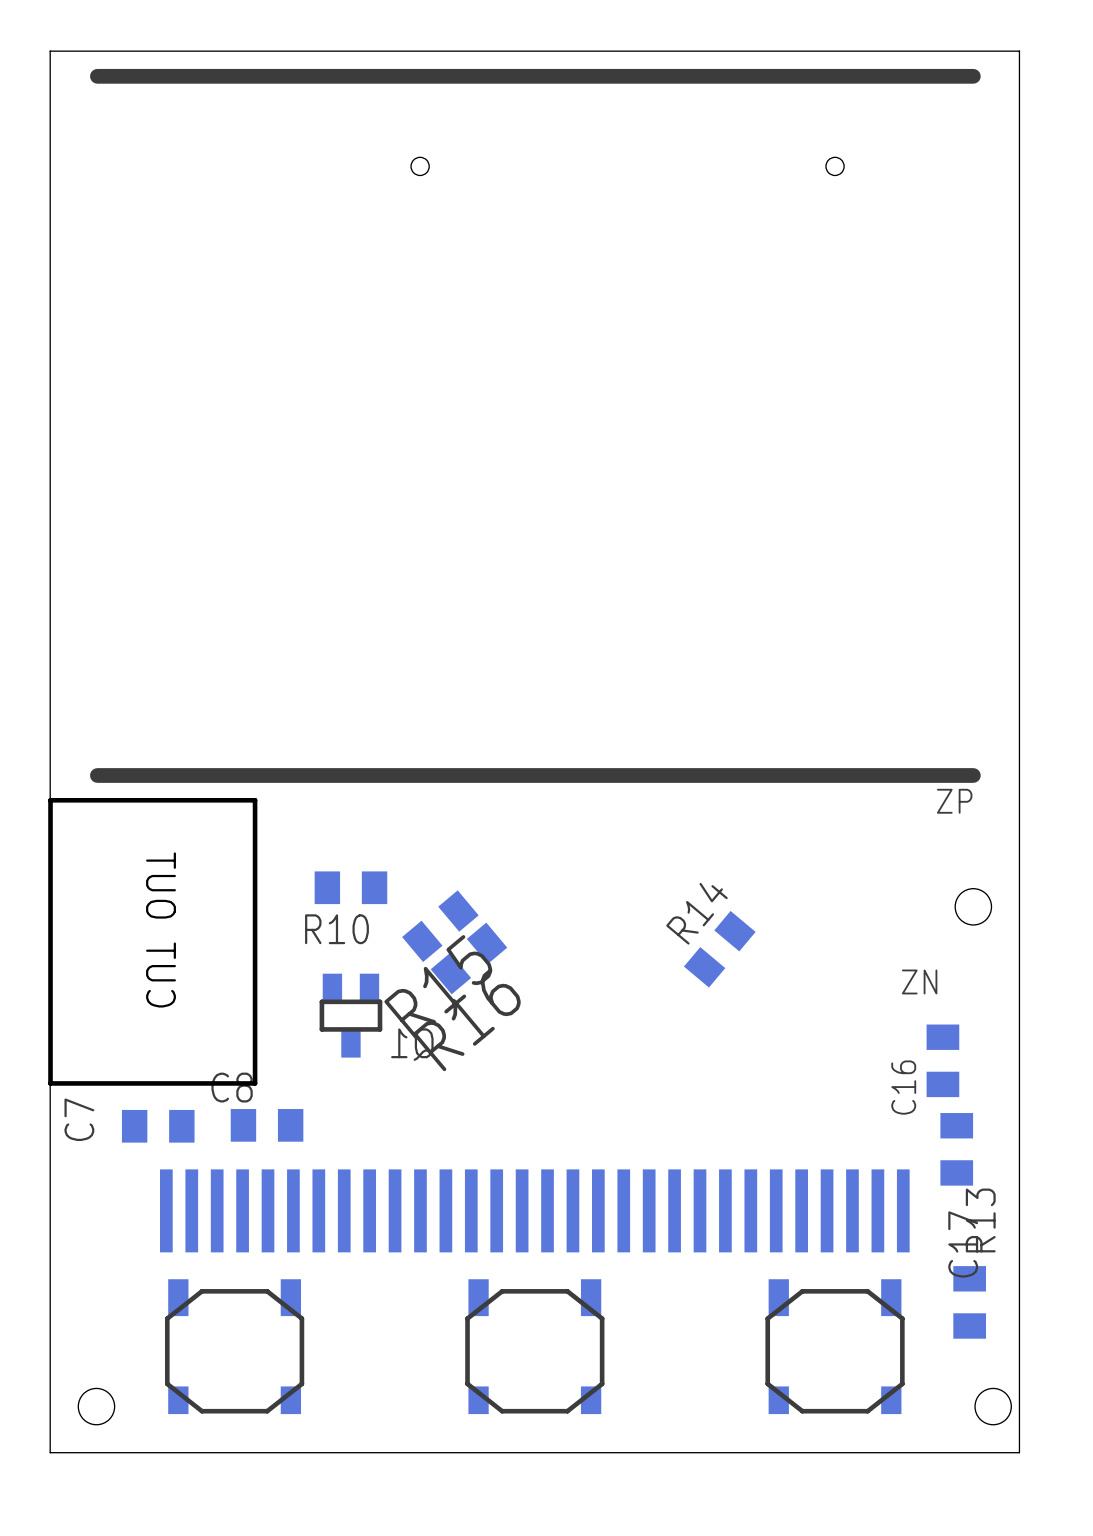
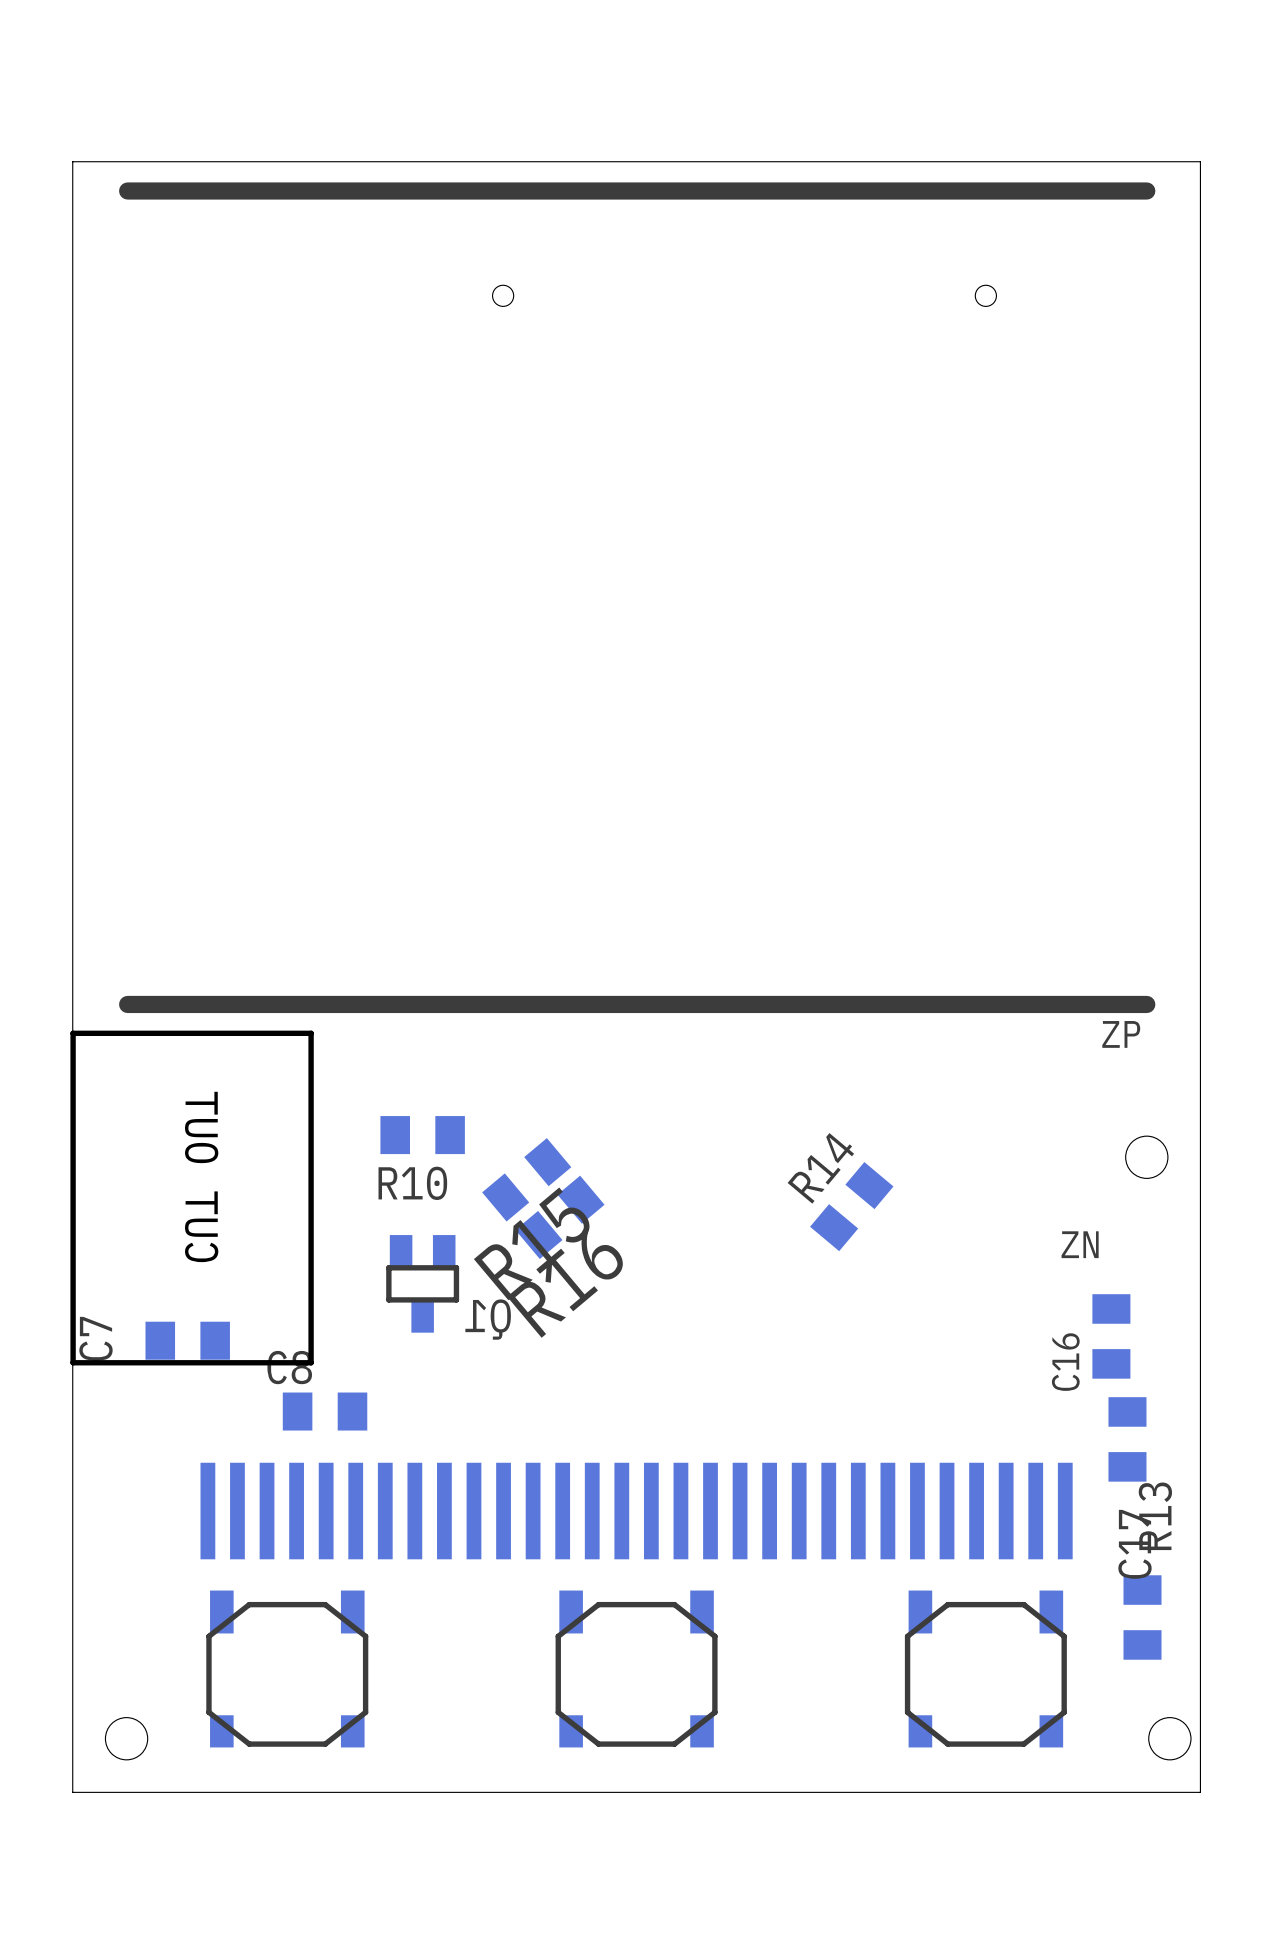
C7 position: (158, 1126) -> (187, 1340)

